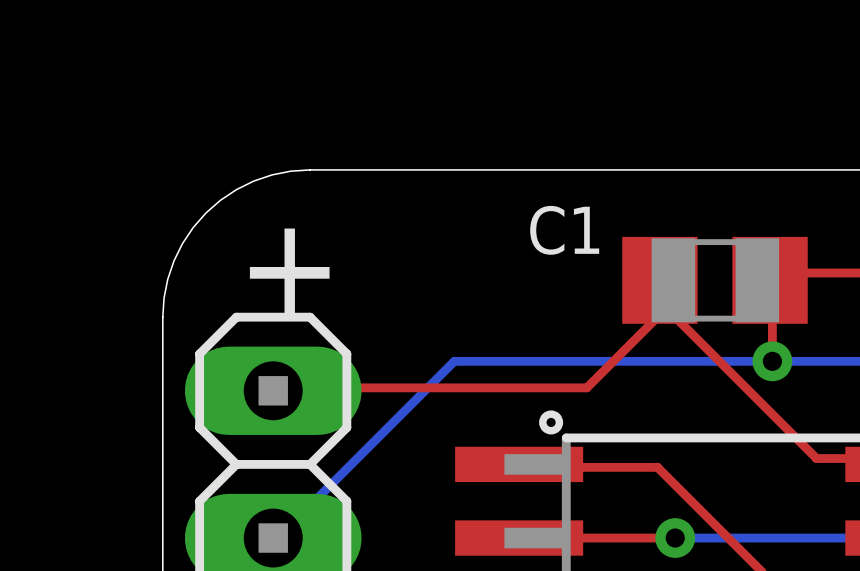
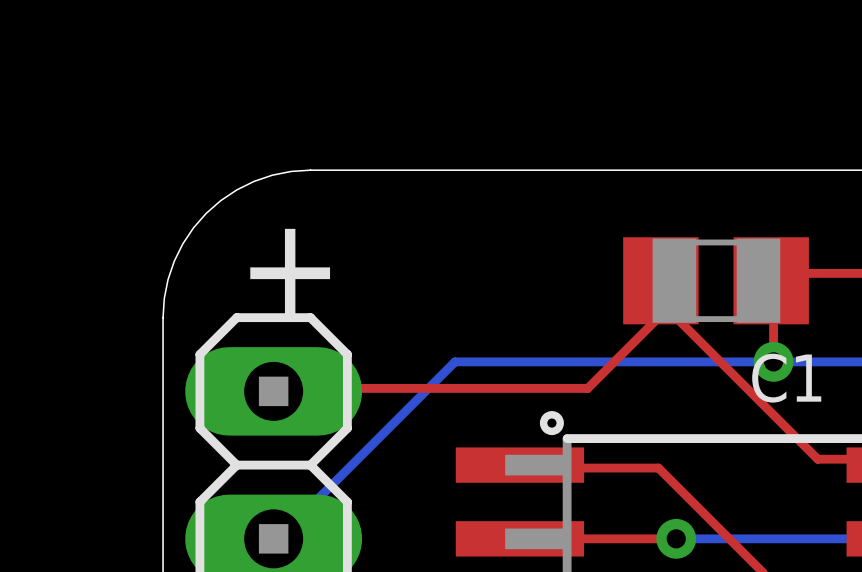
C1 name position: C1 (564, 230) -> C1 (786, 378)

